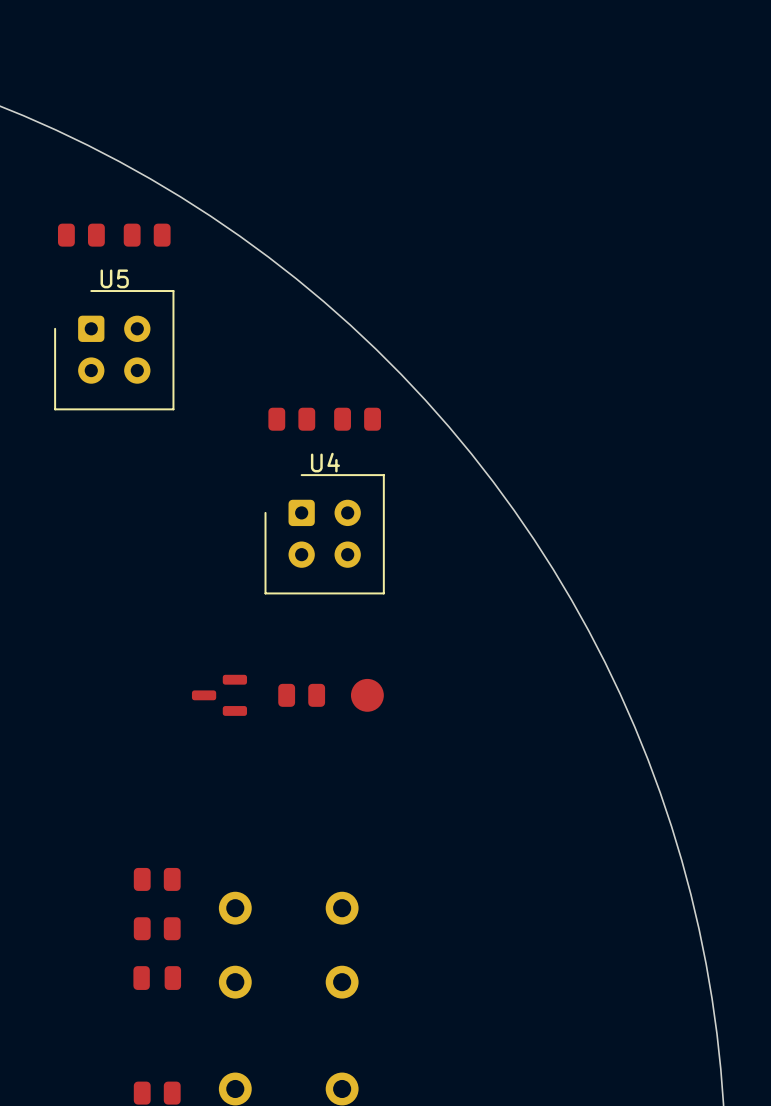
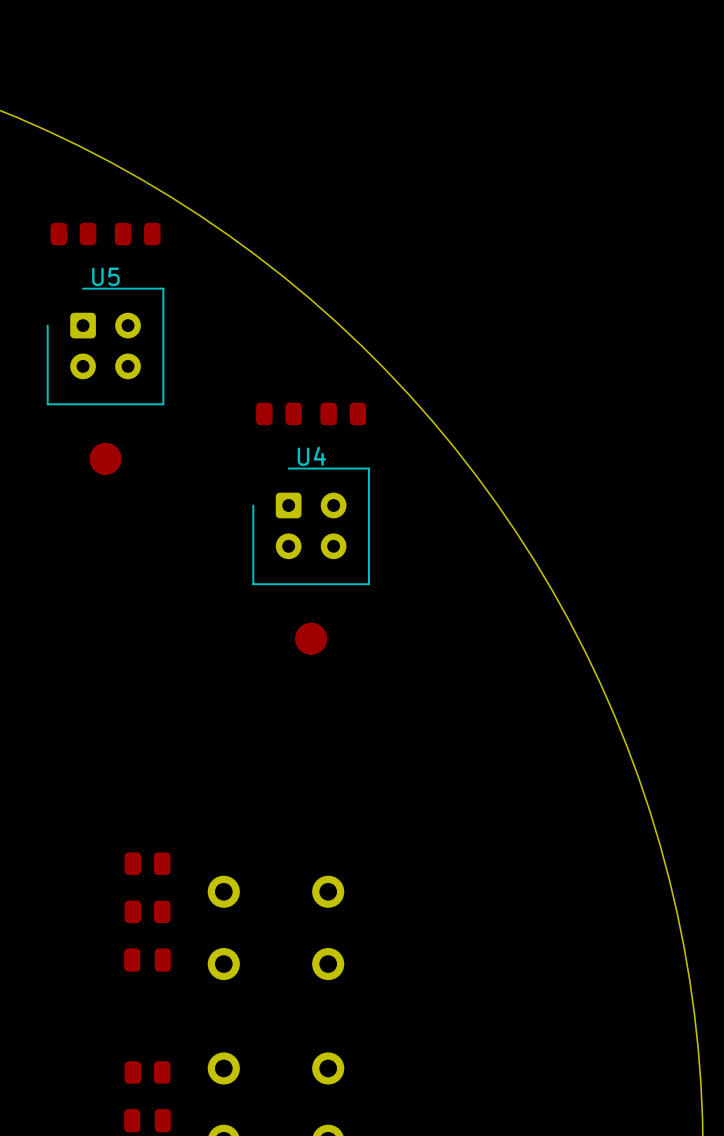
part: none -> (105, 458)
part: (219, 695) -> none
part: (301, 695) -> none
part position: (367, 695) -> (311, 638)

